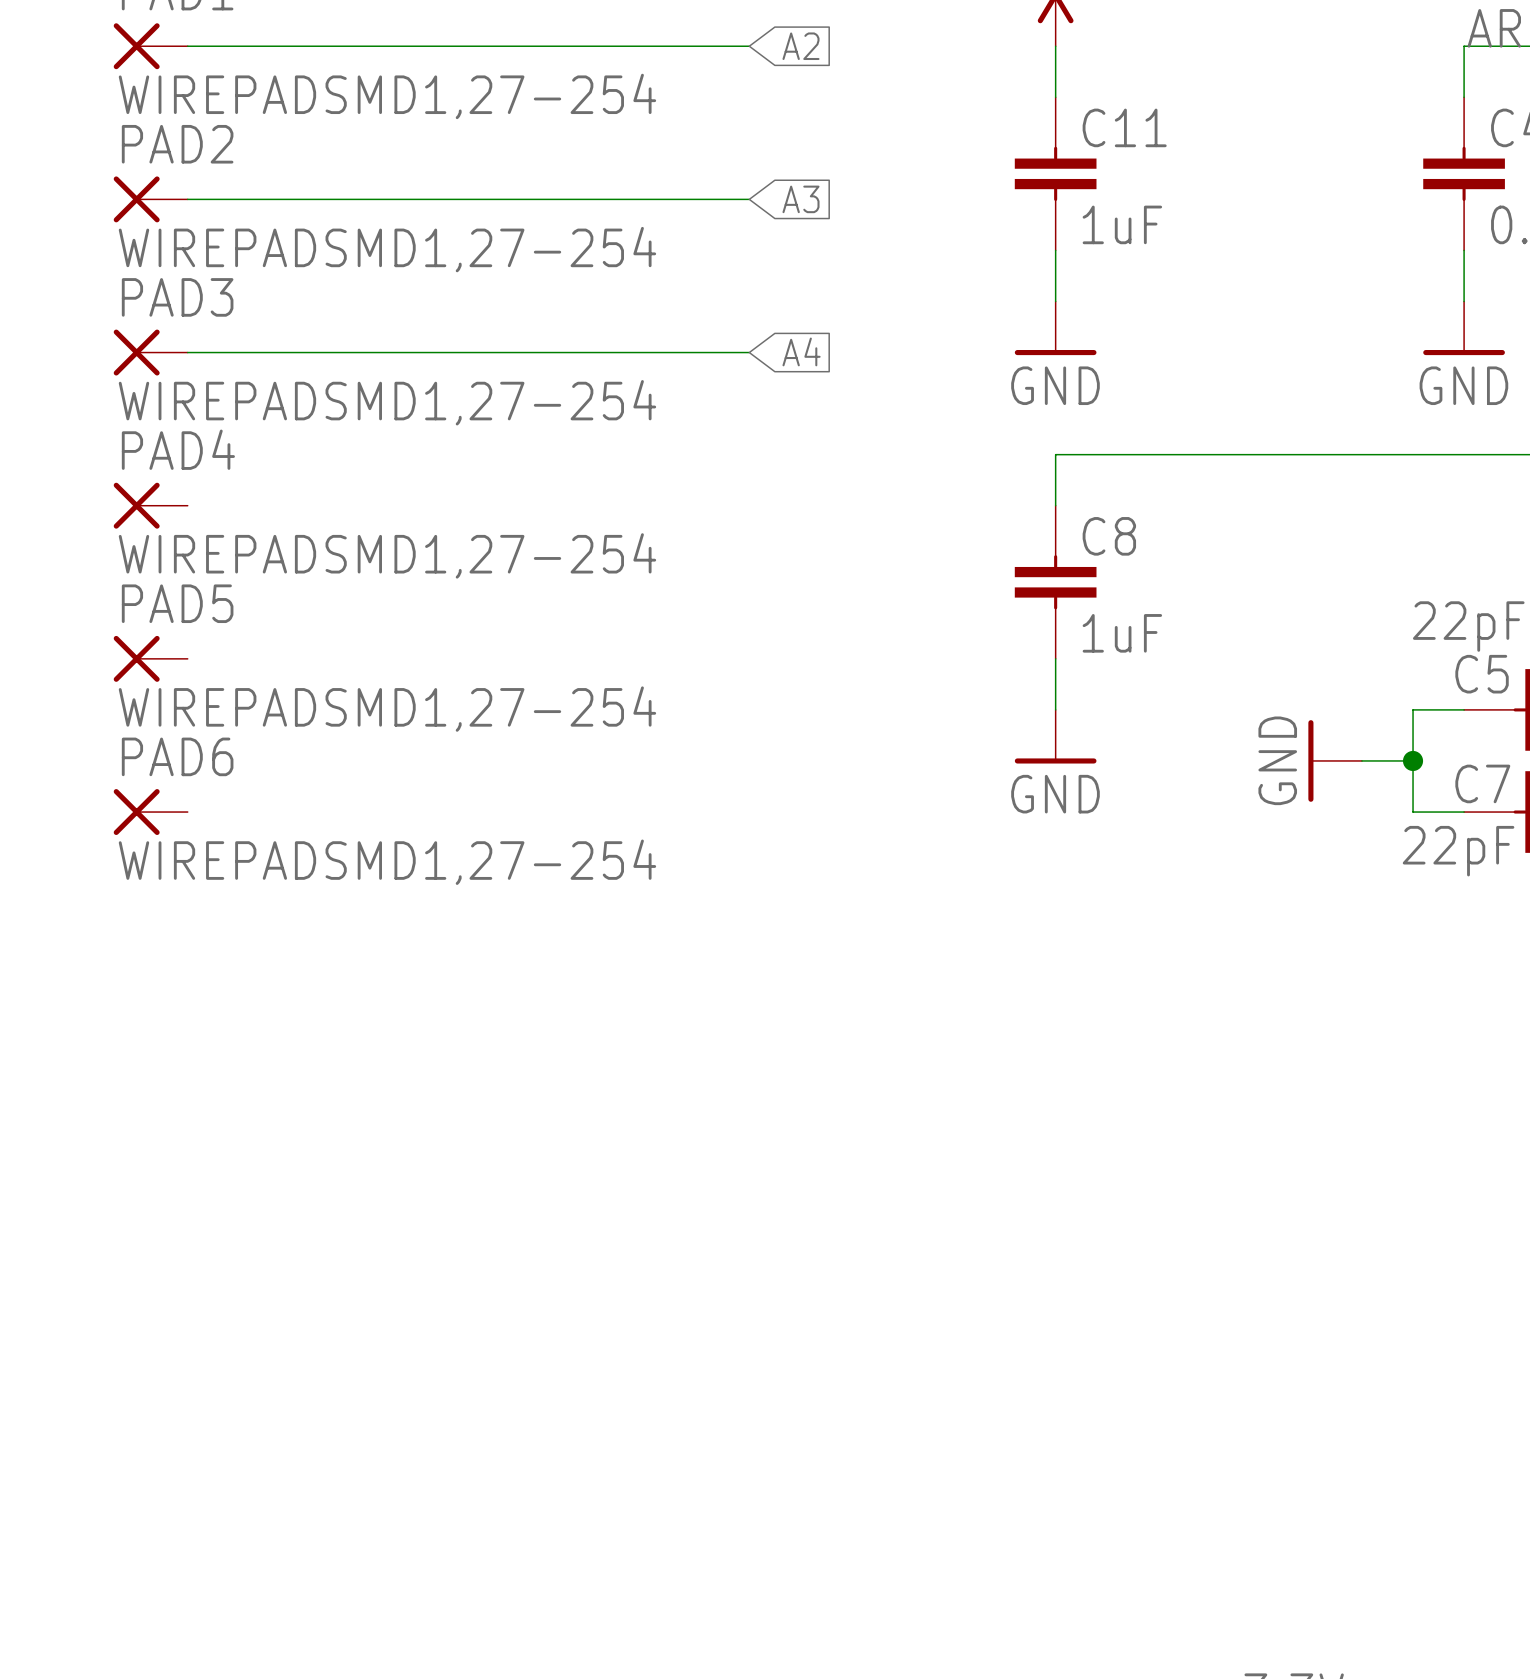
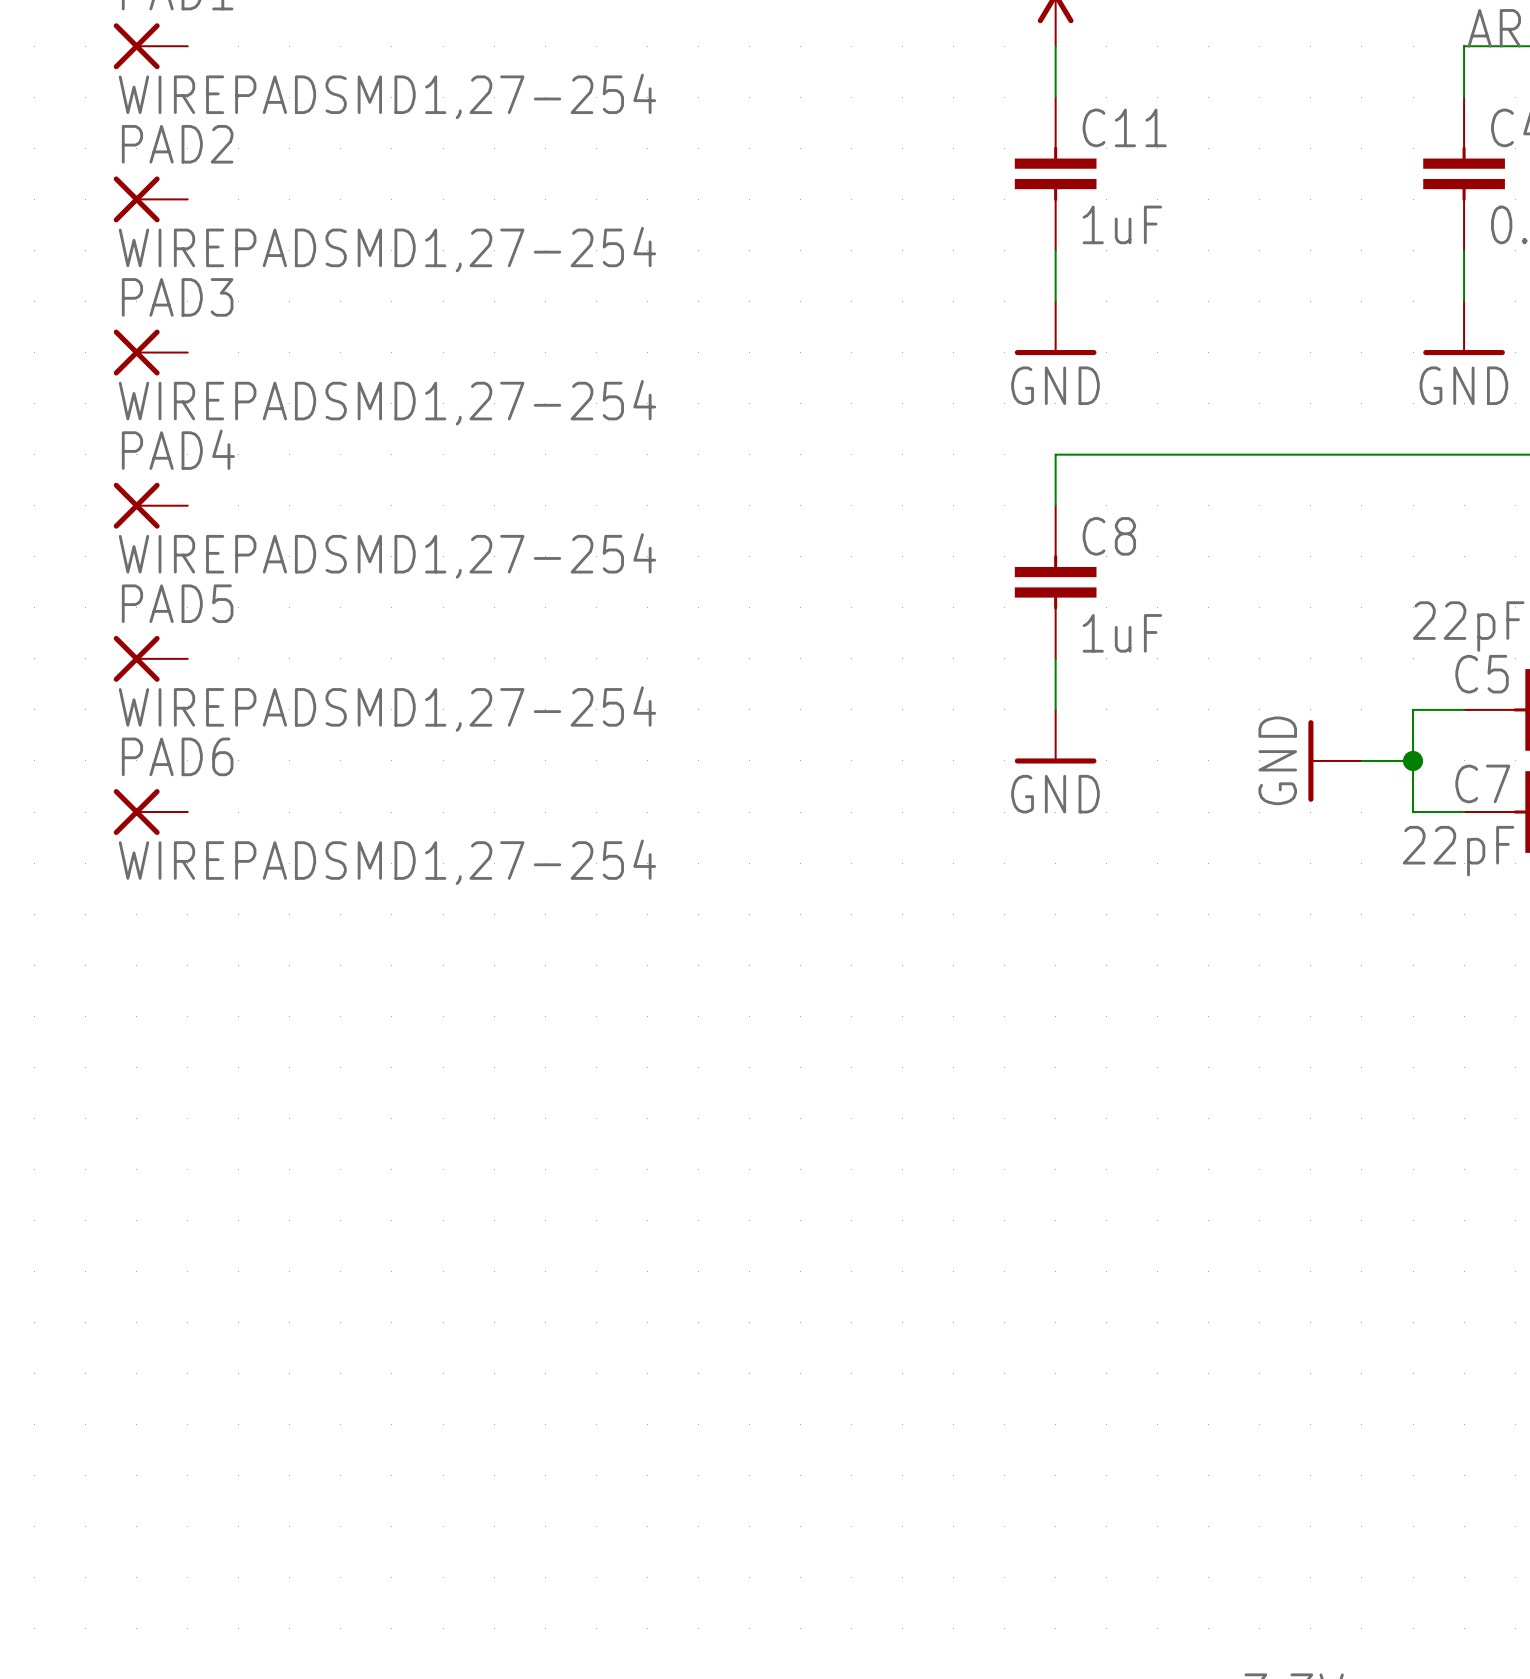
wire: (187, 46) (749, 46) -> none
global label: A2 (800, 46) -> none
wire: (187, 199) (749, 199) -> none
global label: A3 (800, 199) -> none
global label: A4 (801, 351) -> none
wire: (187, 352) (749, 352) -> none

